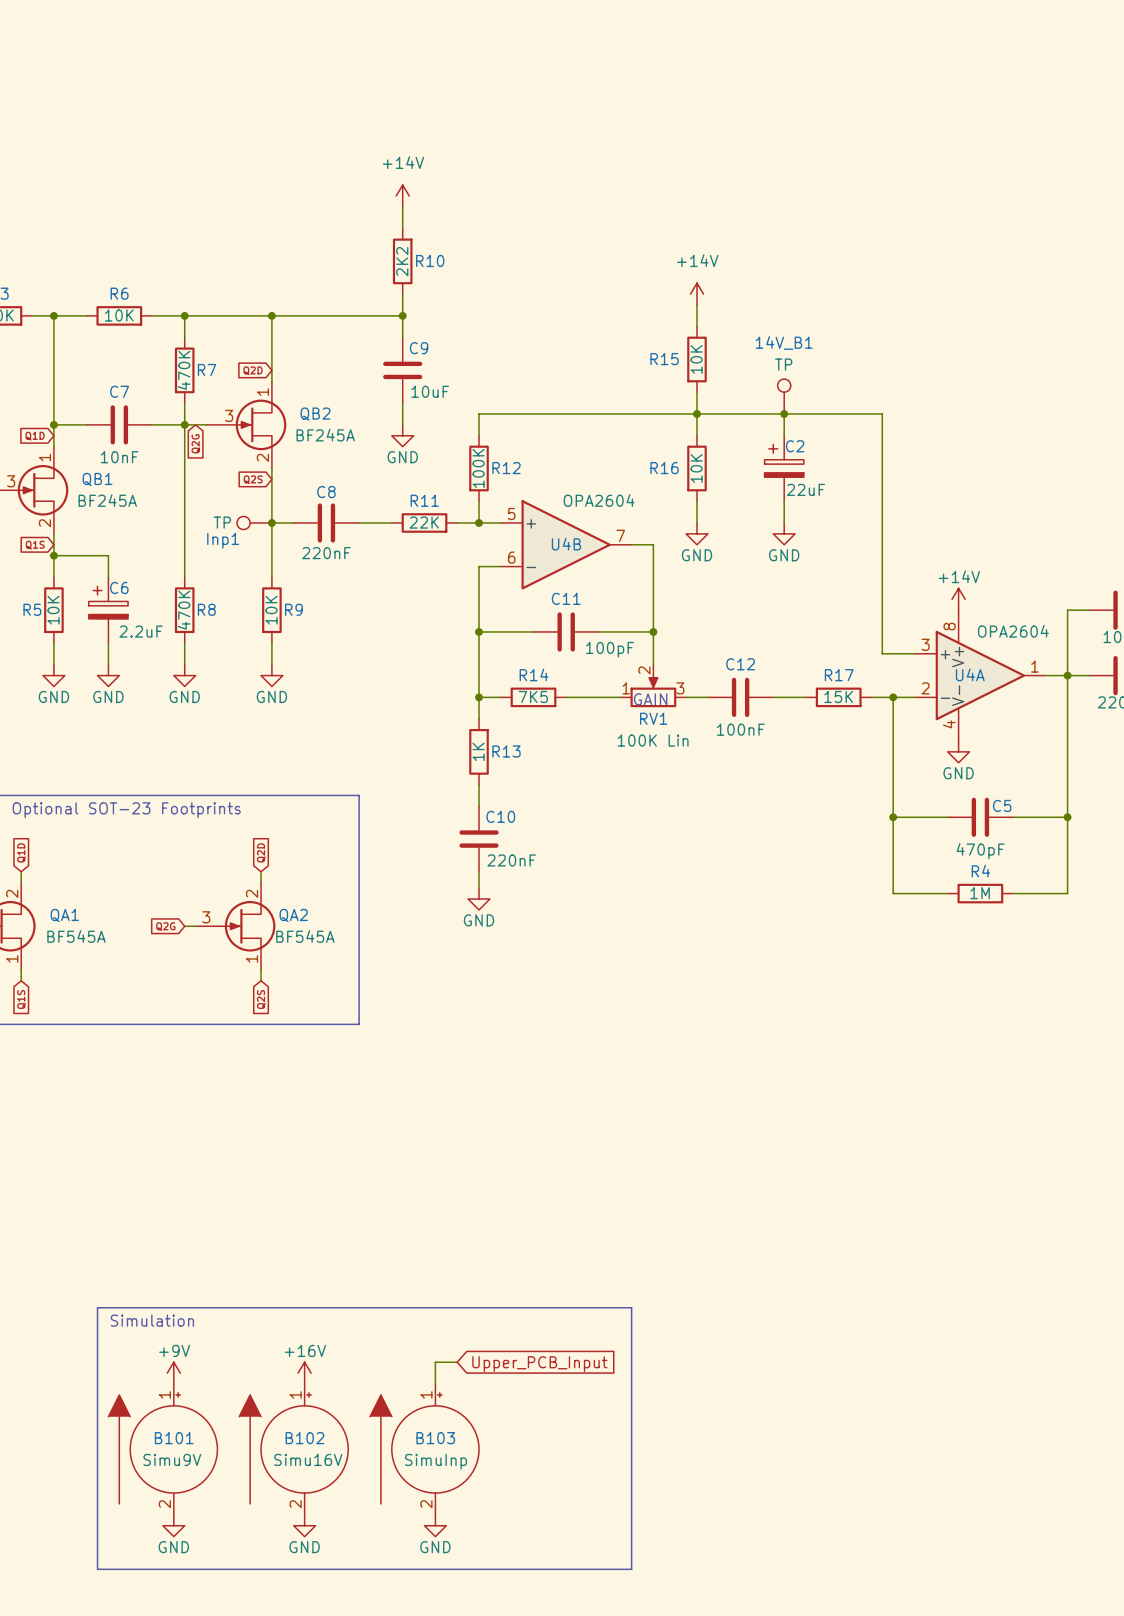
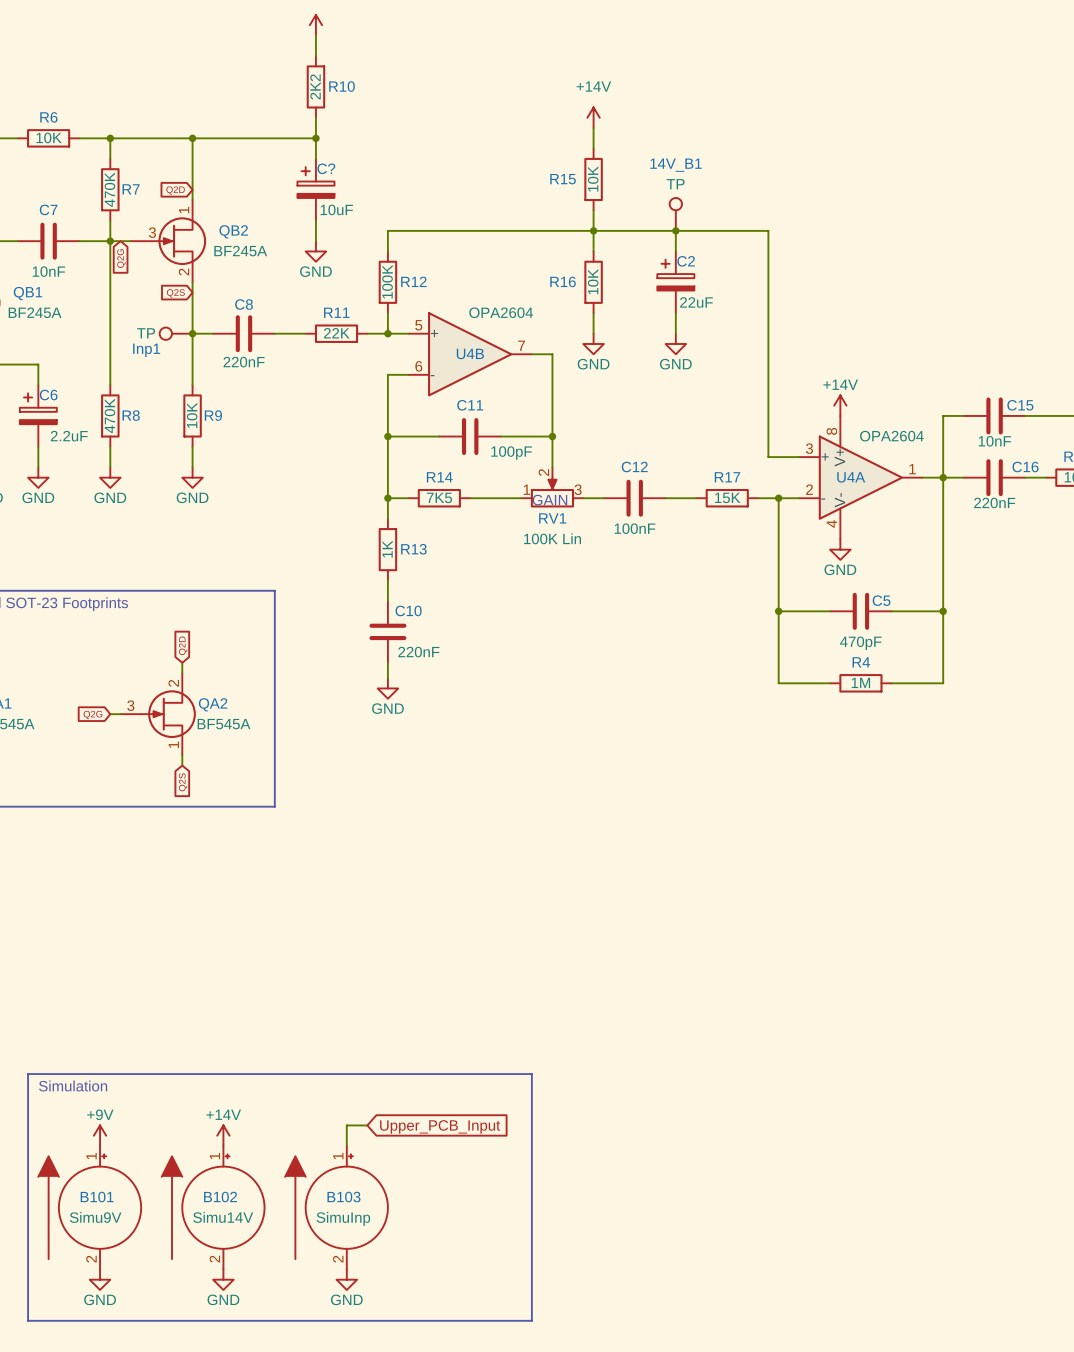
C9: 10uF (402, 370) -> none
C?: none -> 10uF (315, 189)
power symbol: +16V (304, 1373) -> +14V (223, 1135)
B102 value: Simu16V (308, 1459) -> Simu14V (223, 1217)

